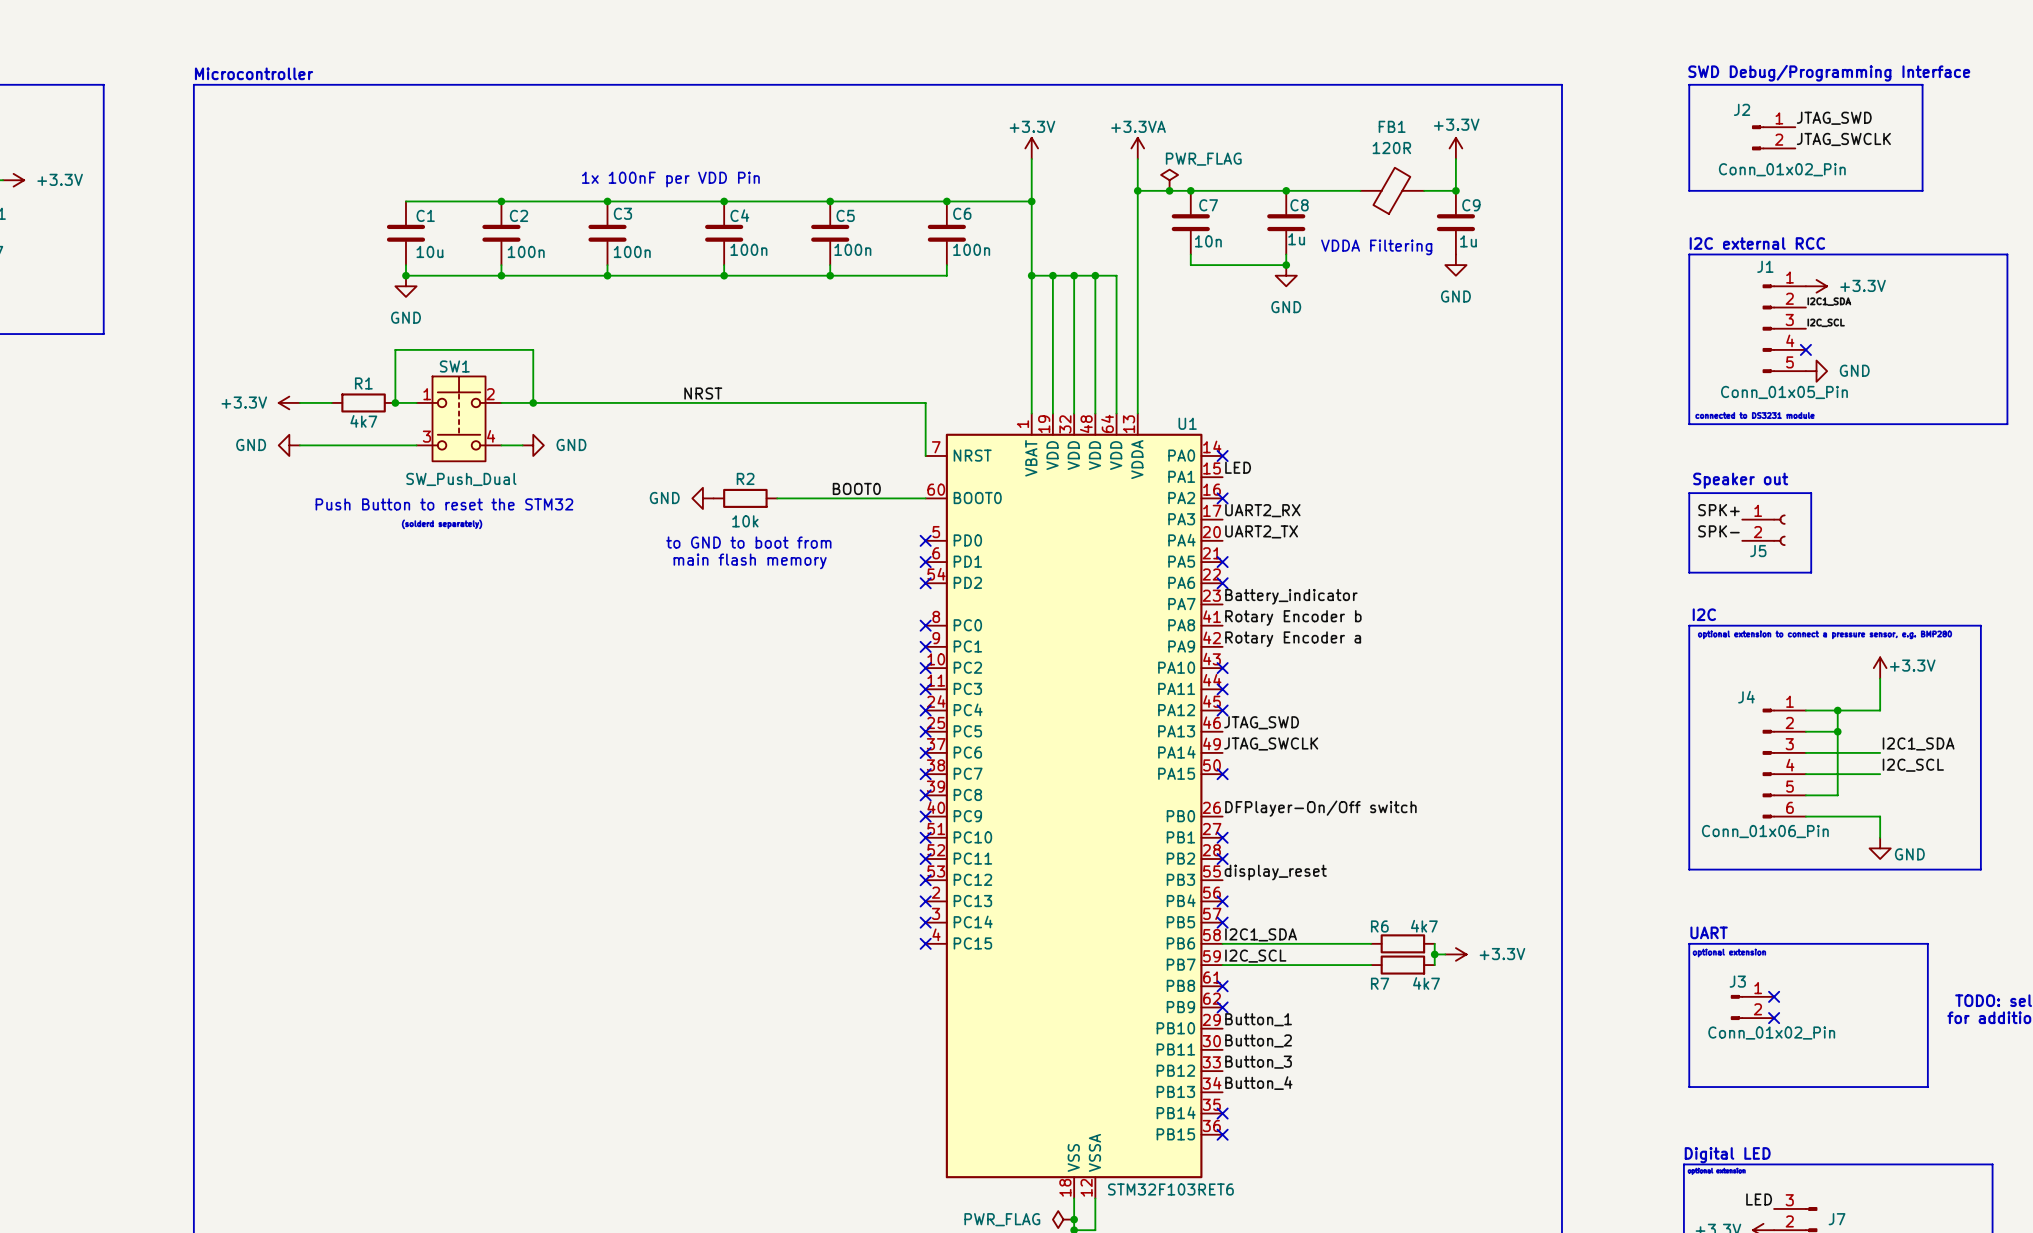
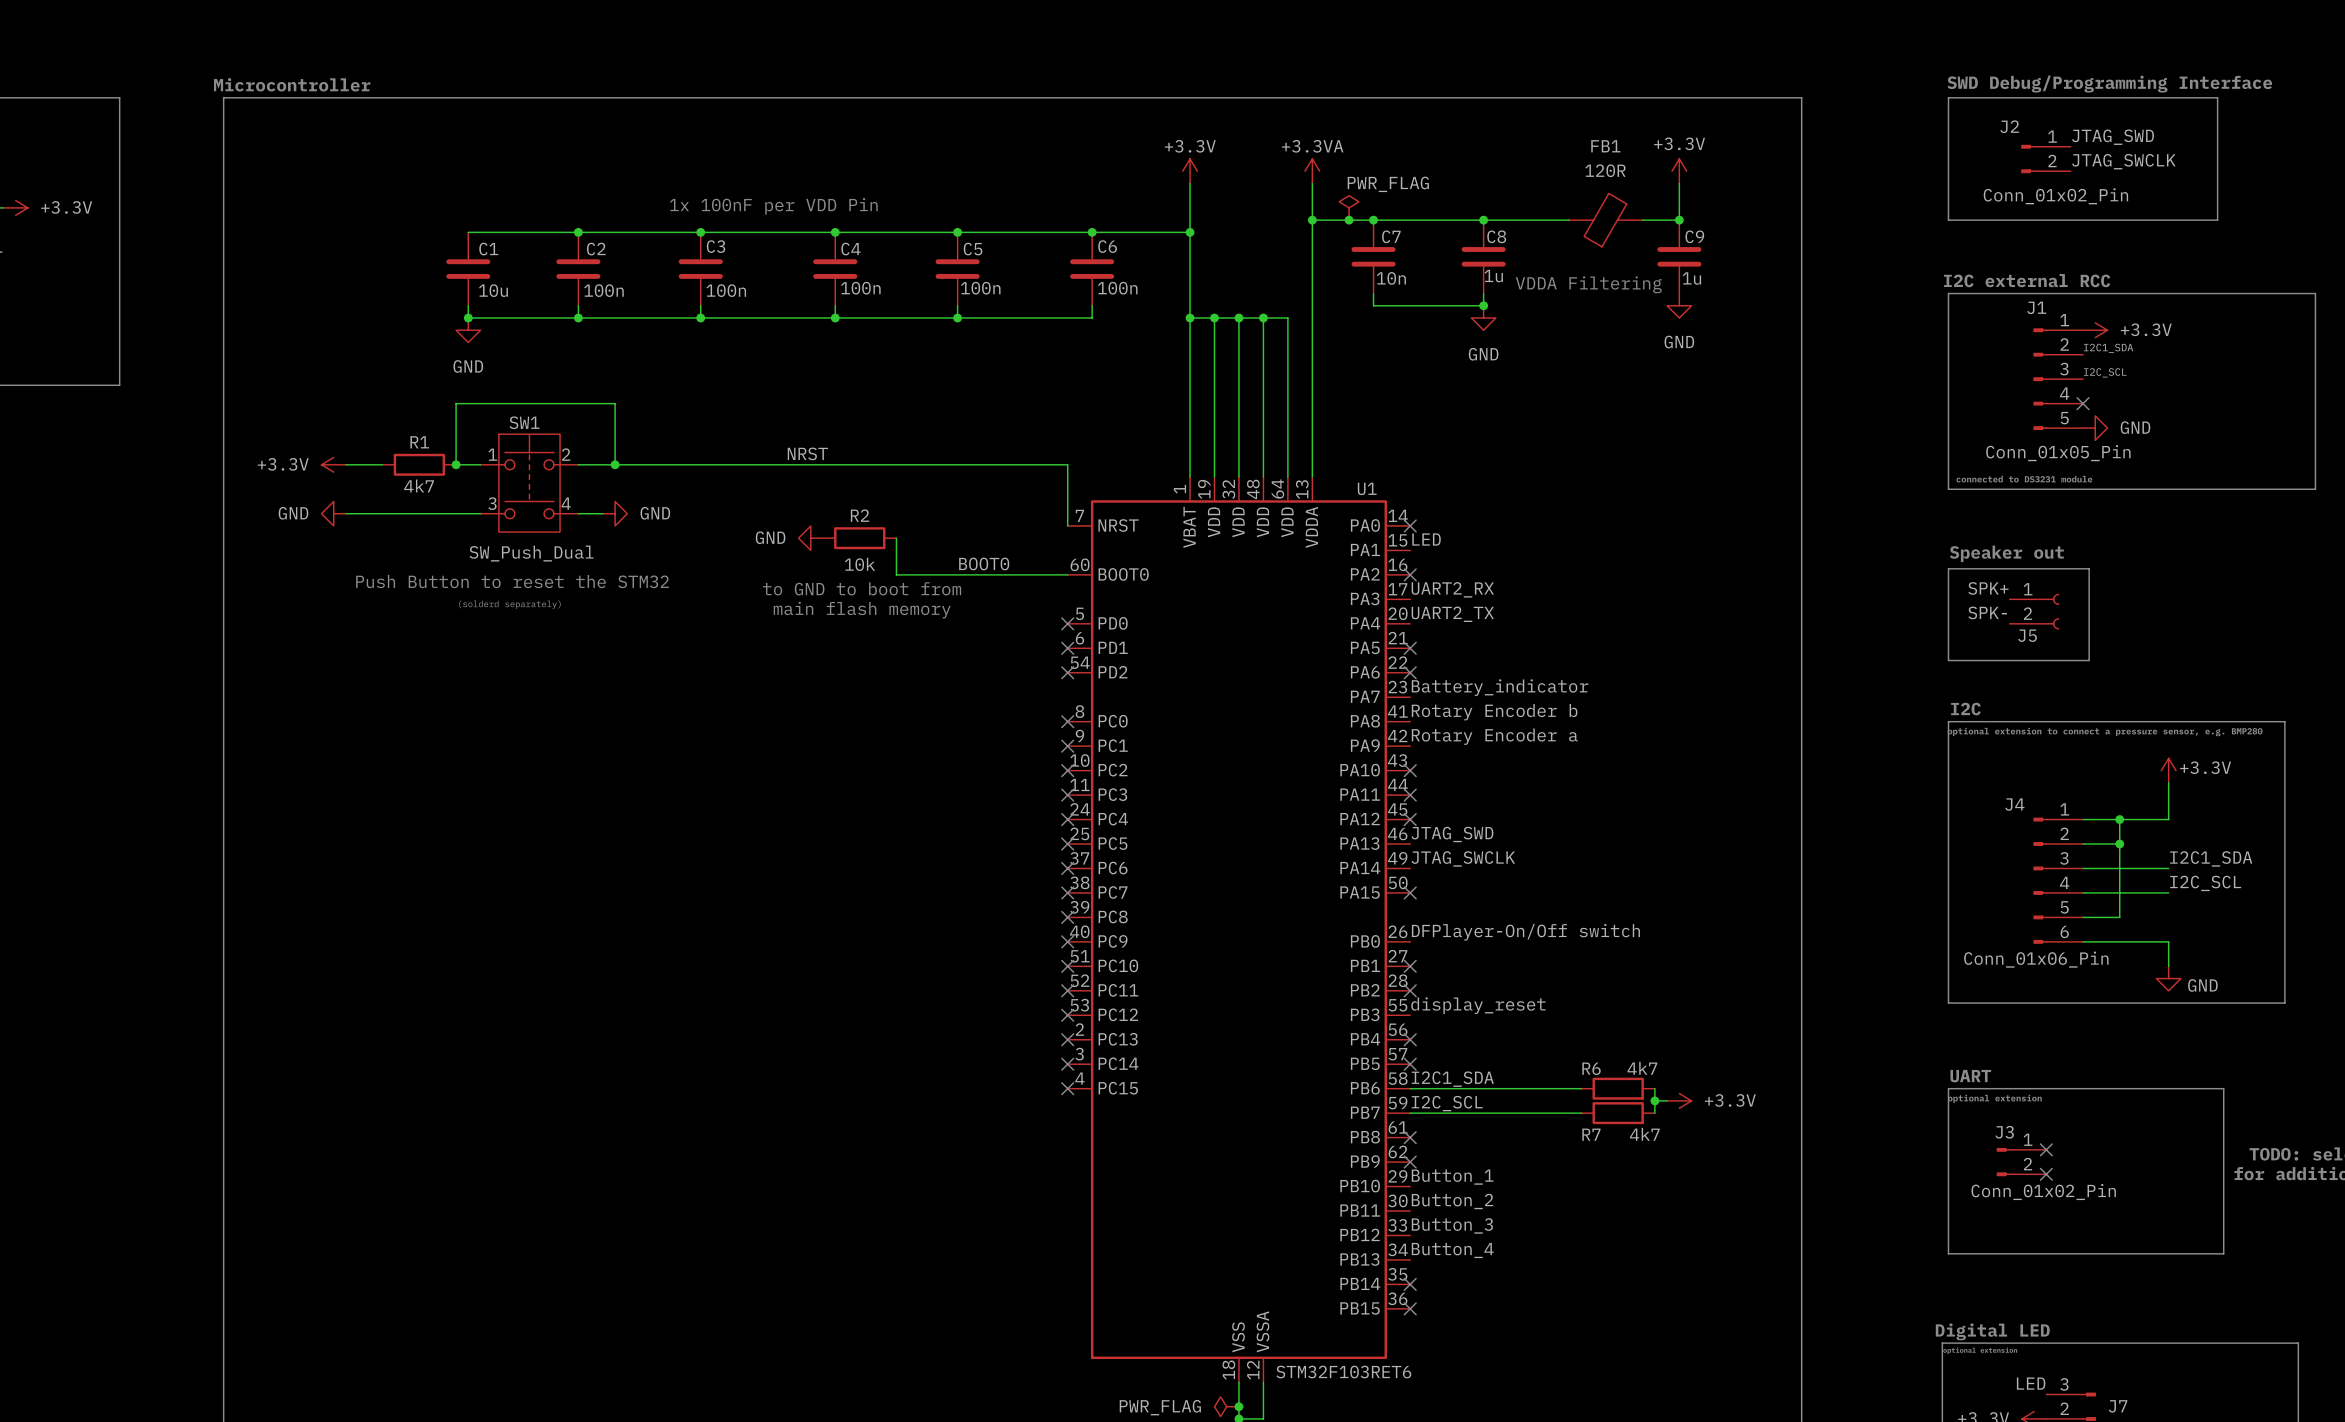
wire: none -> (896, 538) (896, 574)
power symbol position: GND (702, 498) -> GND (810, 538)
R2 position: (745, 498) -> (859, 538)
text position: to GND to boot from (748, 542) -> to GND to boot from (862, 588)
text position: main flash memory (750, 561) -> main flash memory (862, 610)

